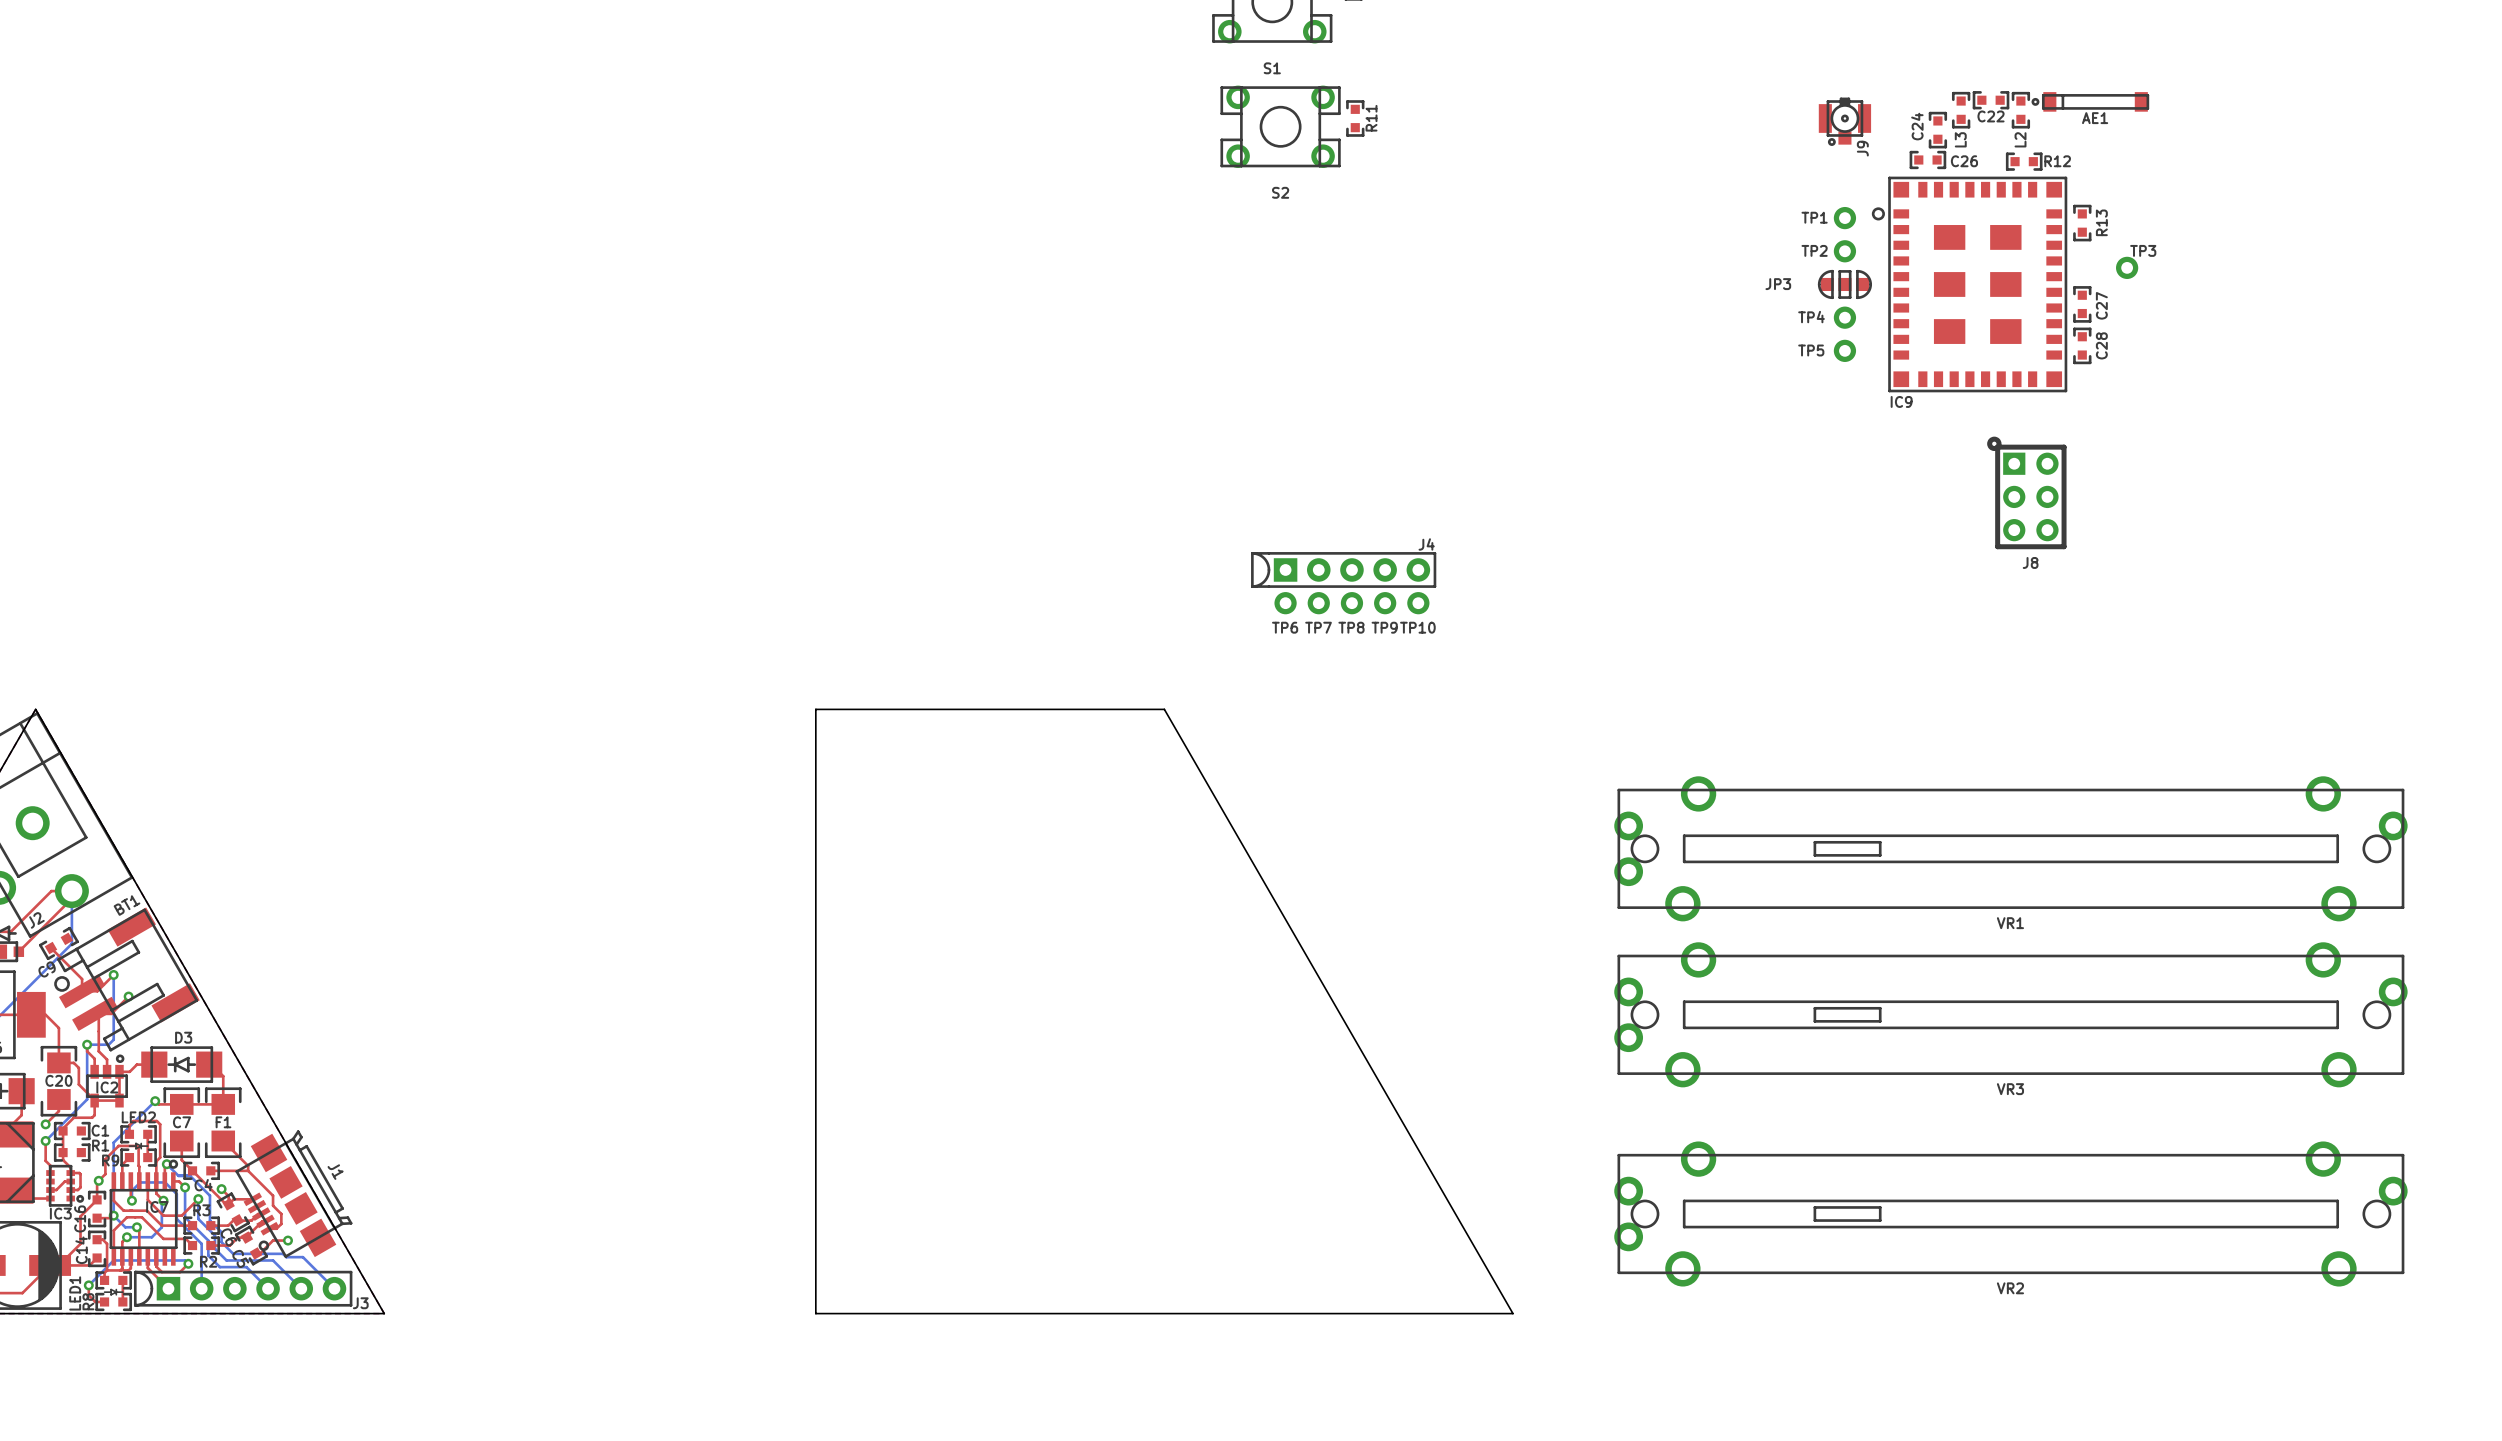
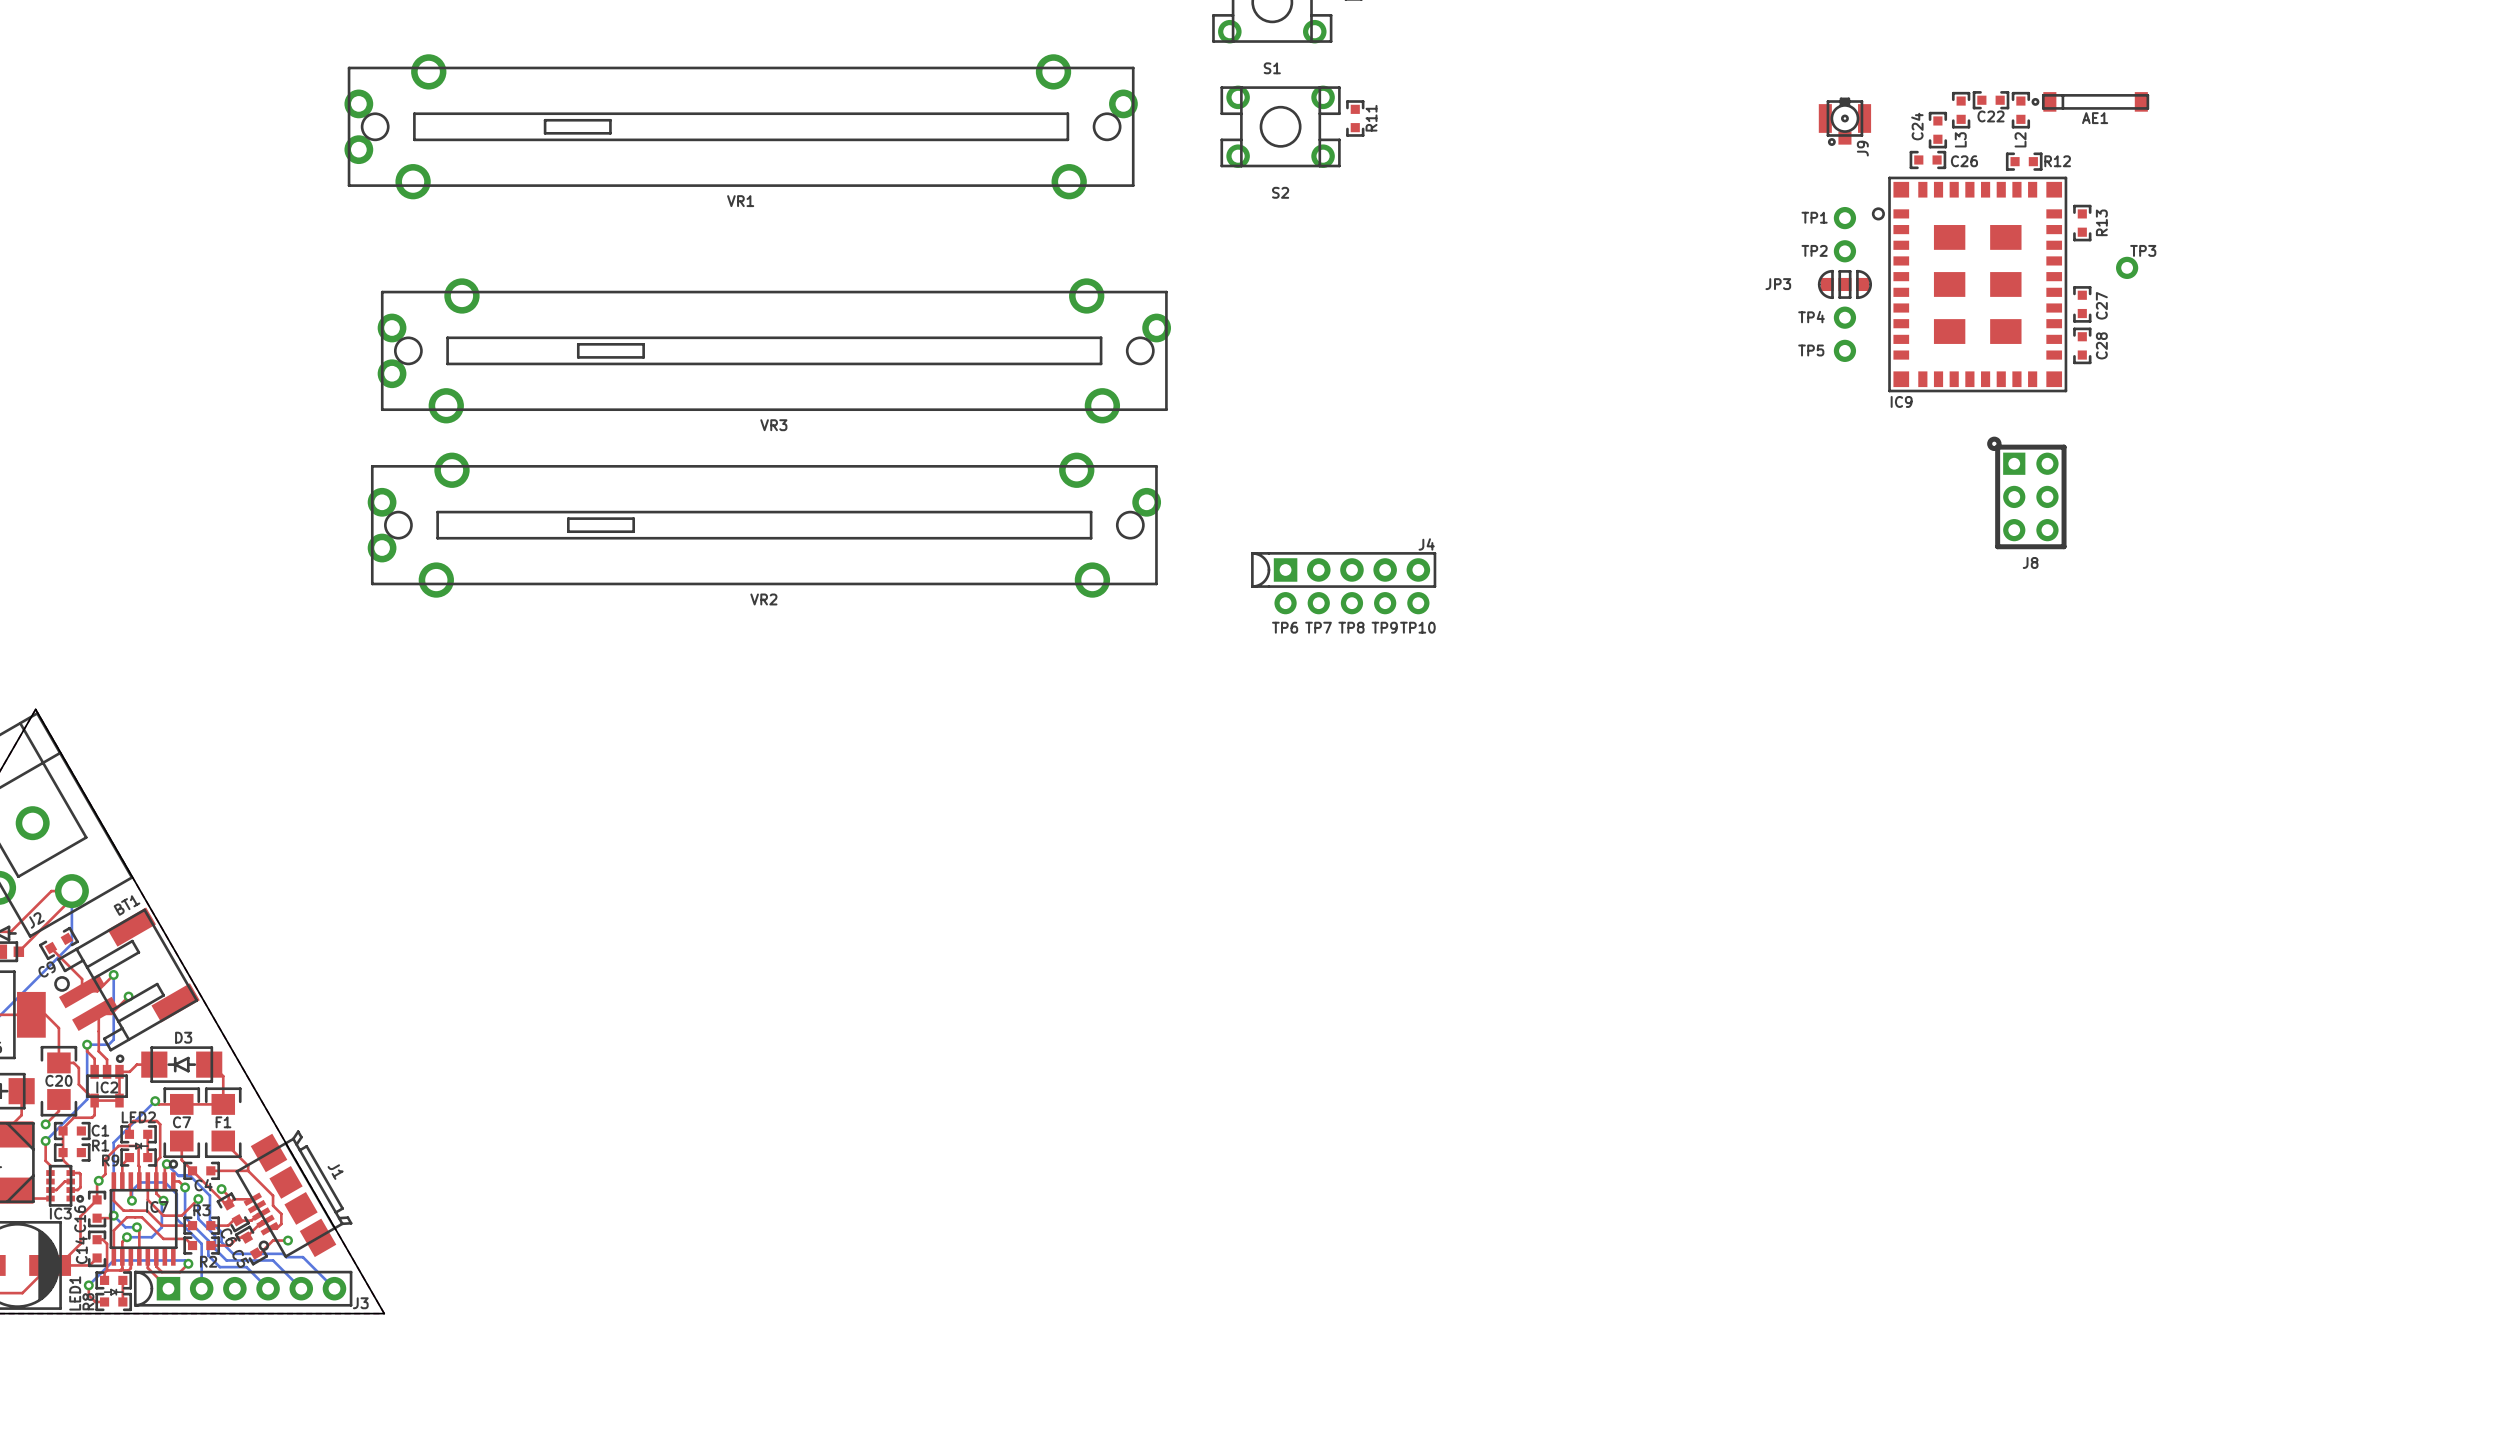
board edge: (815, 709) (815, 1313) (1512, 1313) (1164, 709) (815, 709) -> none
VR1 position: (2010, 848) -> (741, 126)
VR3 position: (2010, 1014) -> (774, 350)
VR2 position: (2010, 1214) -> (764, 525)

